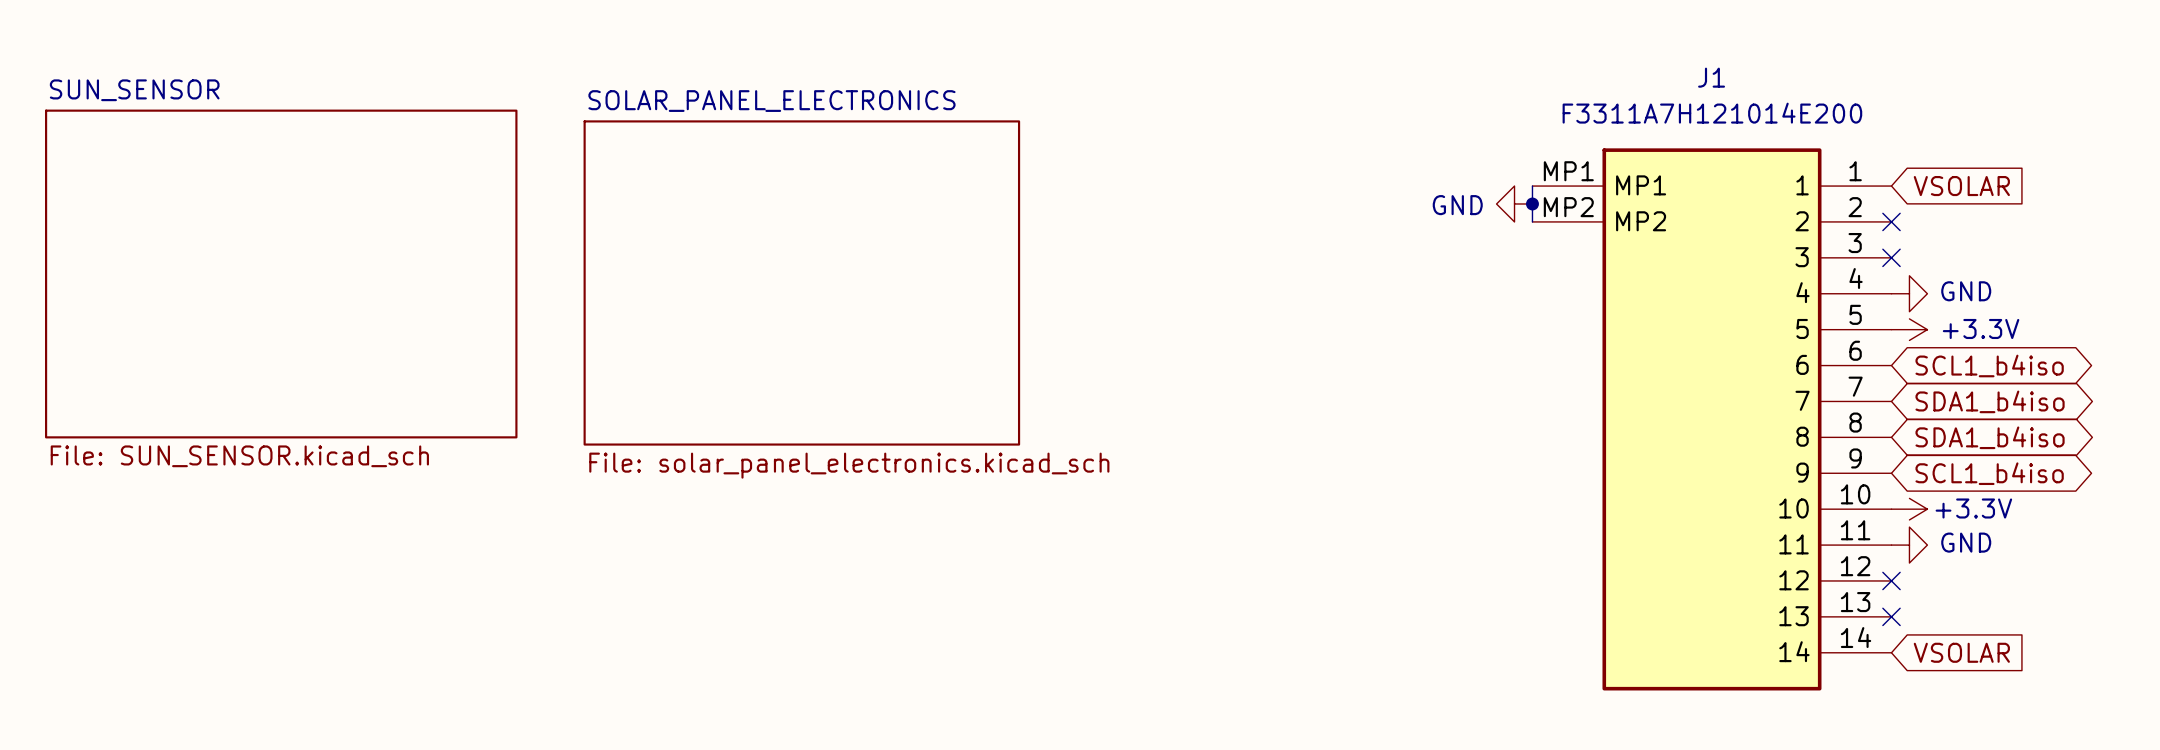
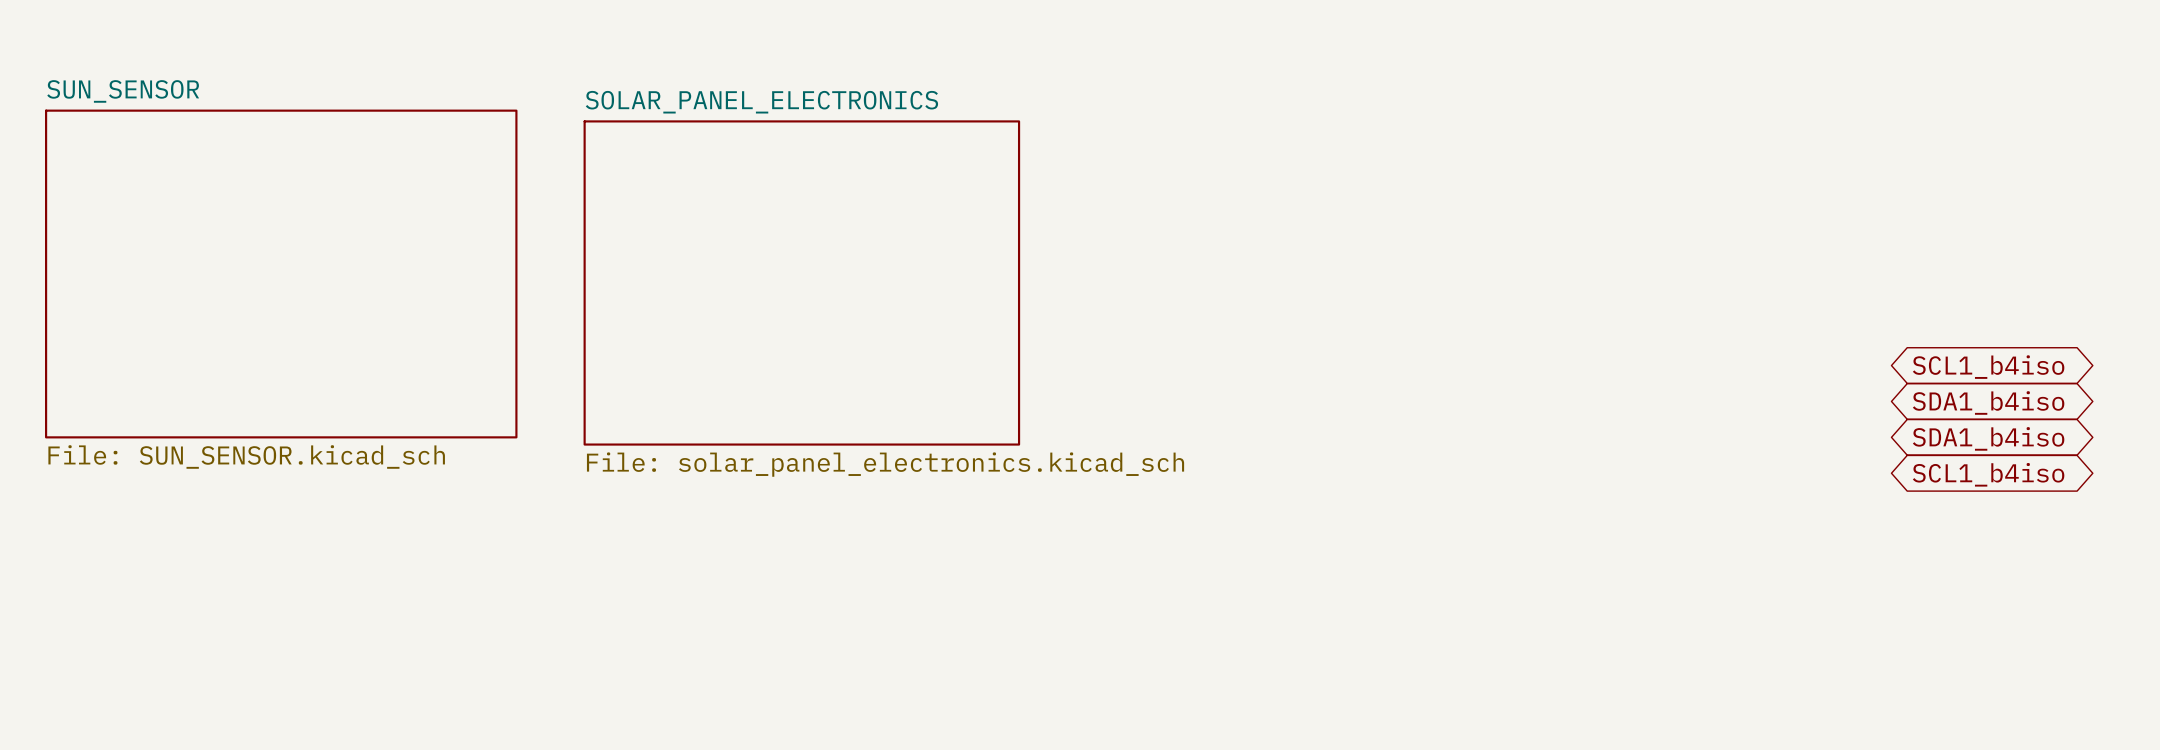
wire: (1532, 186) (1532, 221) -> none
global label: VSOLAR (1961, 186) -> none
power symbol: GND (1514, 203) -> none
junction: (1532, 203) -> none
no-connect mark: (1891, 221) -> none
no-connect mark: (1891, 257) -> none
power symbol: GND (1909, 293) -> none
power symbol: +3.3V (1909, 329) -> none
J1: F3311A7H121014E200 (1711, 419) -> none
power symbol: +3.3V (1909, 509) -> none
power symbol: GND (1909, 545) -> none
no-connect mark: (1891, 580) -> none
no-connect mark: (1891, 616) -> none
global label: VSOLAR (1961, 652) -> none

